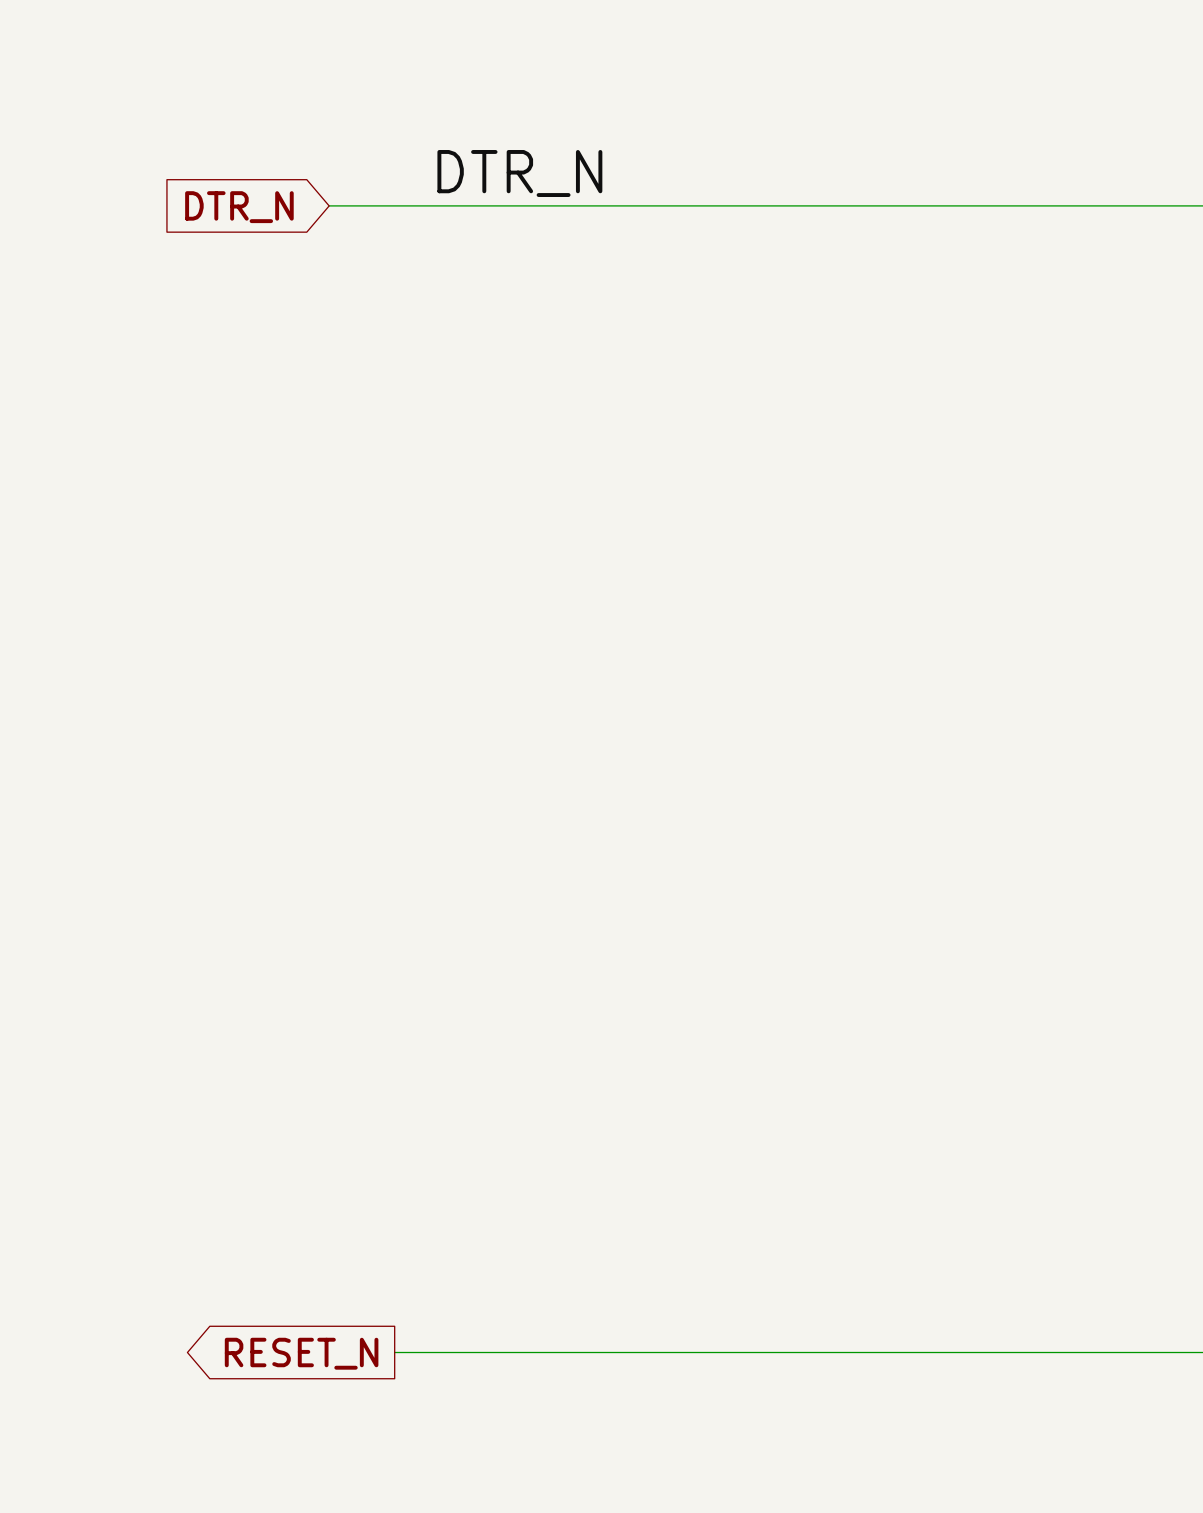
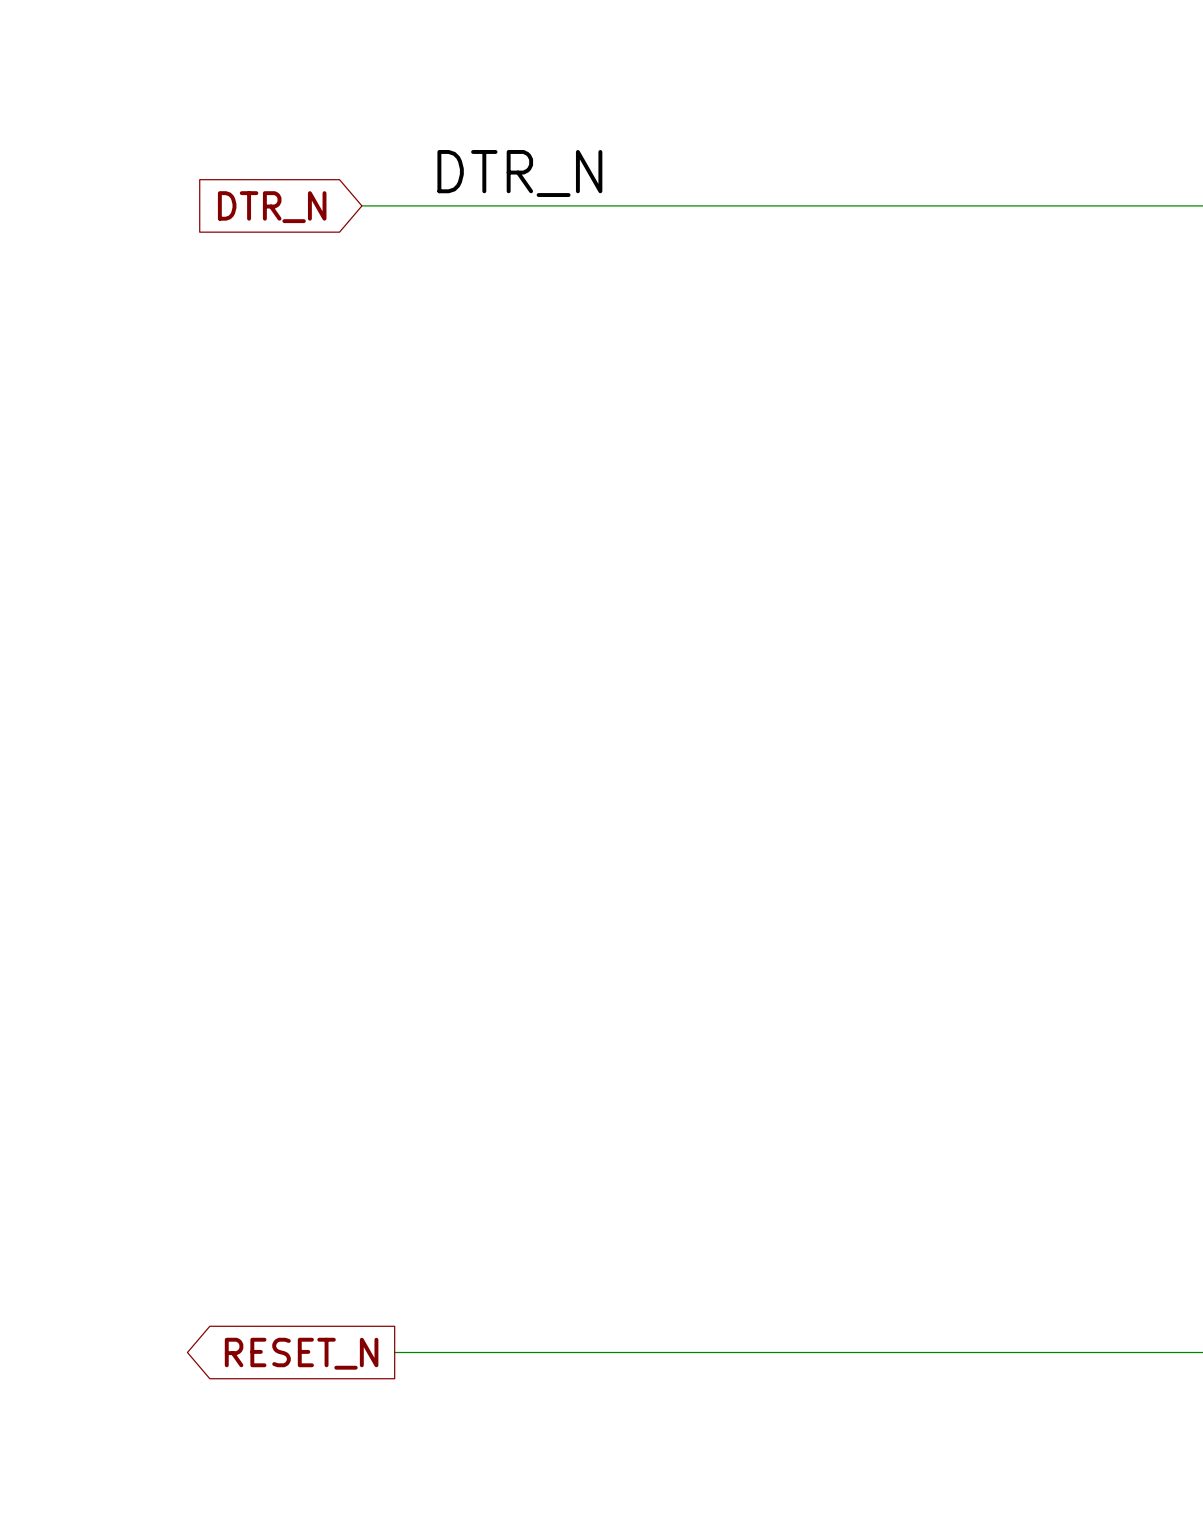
wire: (329, 205) (361, 205) -> none
global label position: DTR_N (239, 207) -> DTR_N (272, 207)

